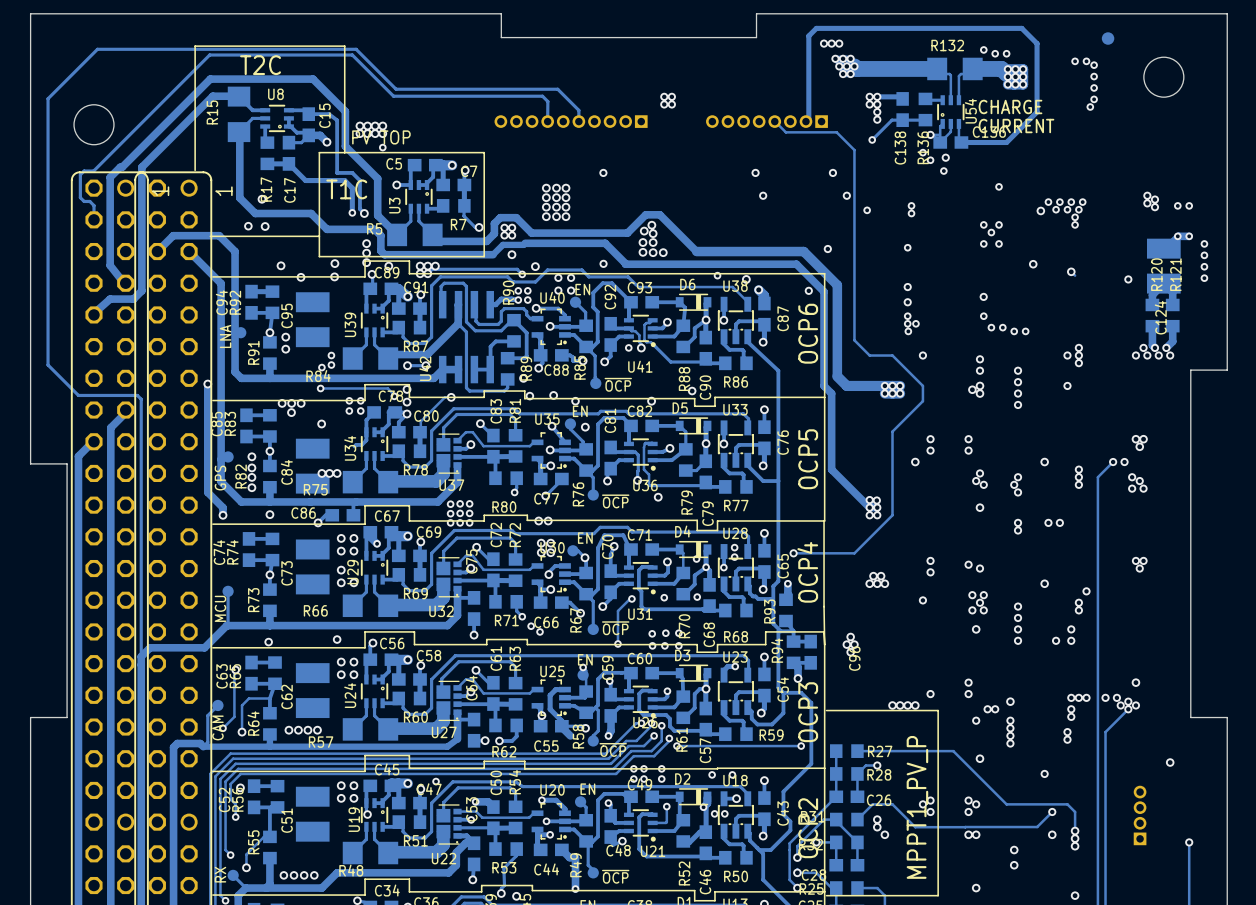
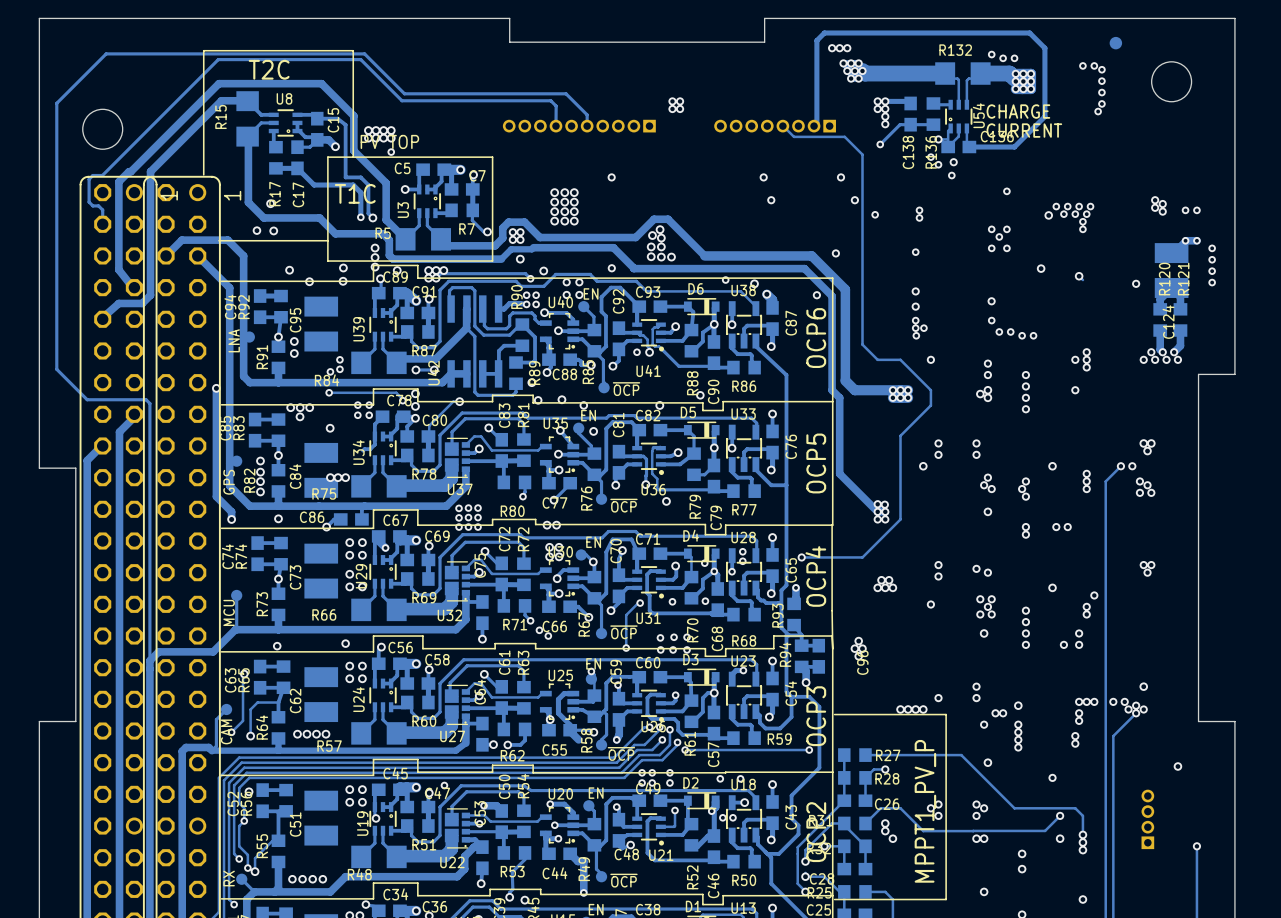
track: none -> (244, 820) (239, 826) (239, 846) (247, 854) (247, 868)
via: none -> (247, 868)

